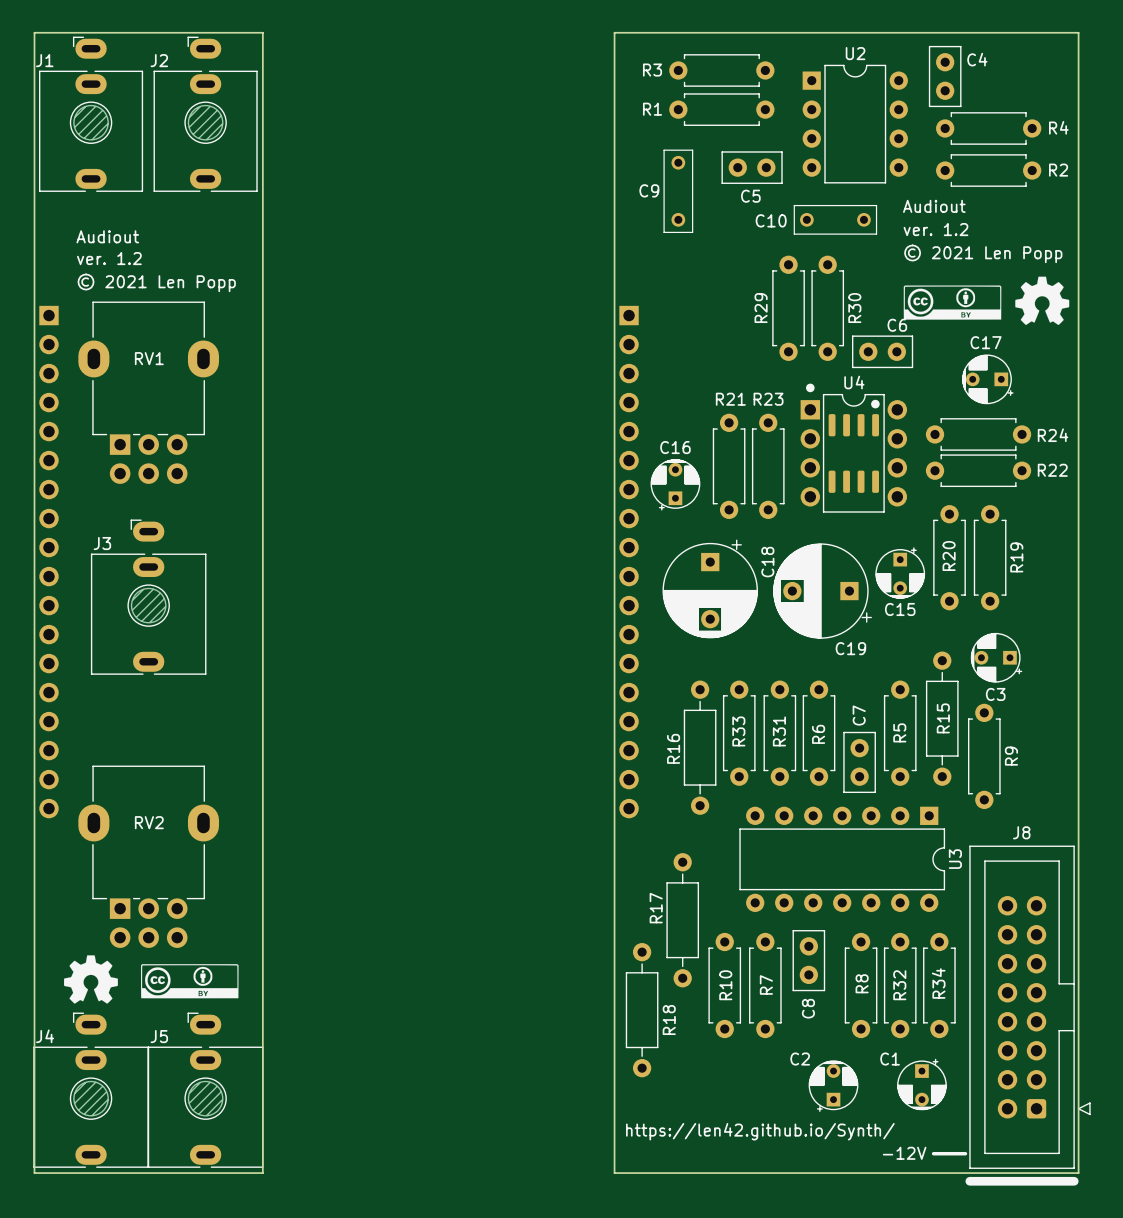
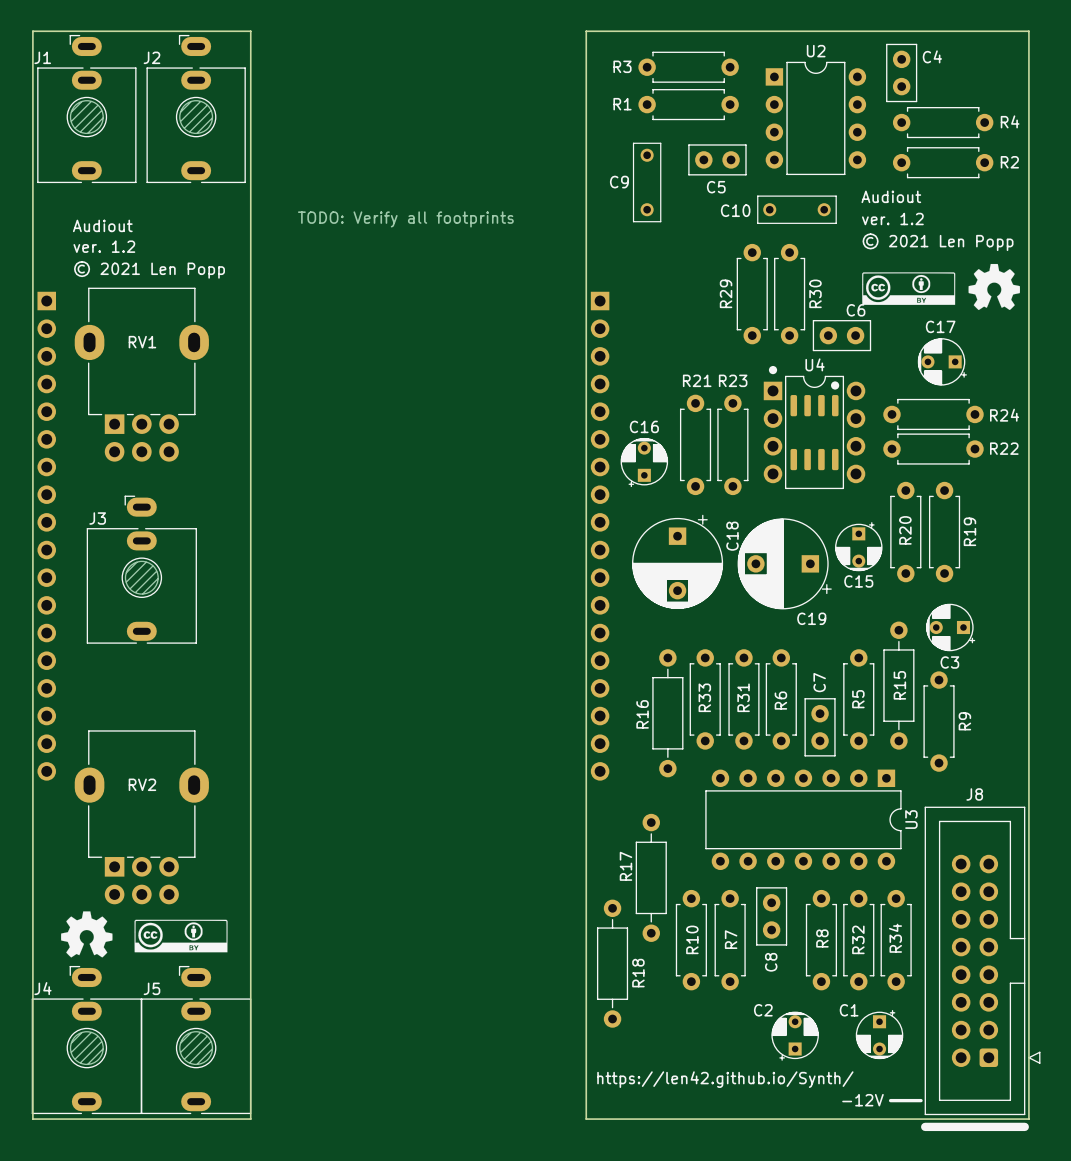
text: none -> TODO: Verify all footprints (405, 219)

